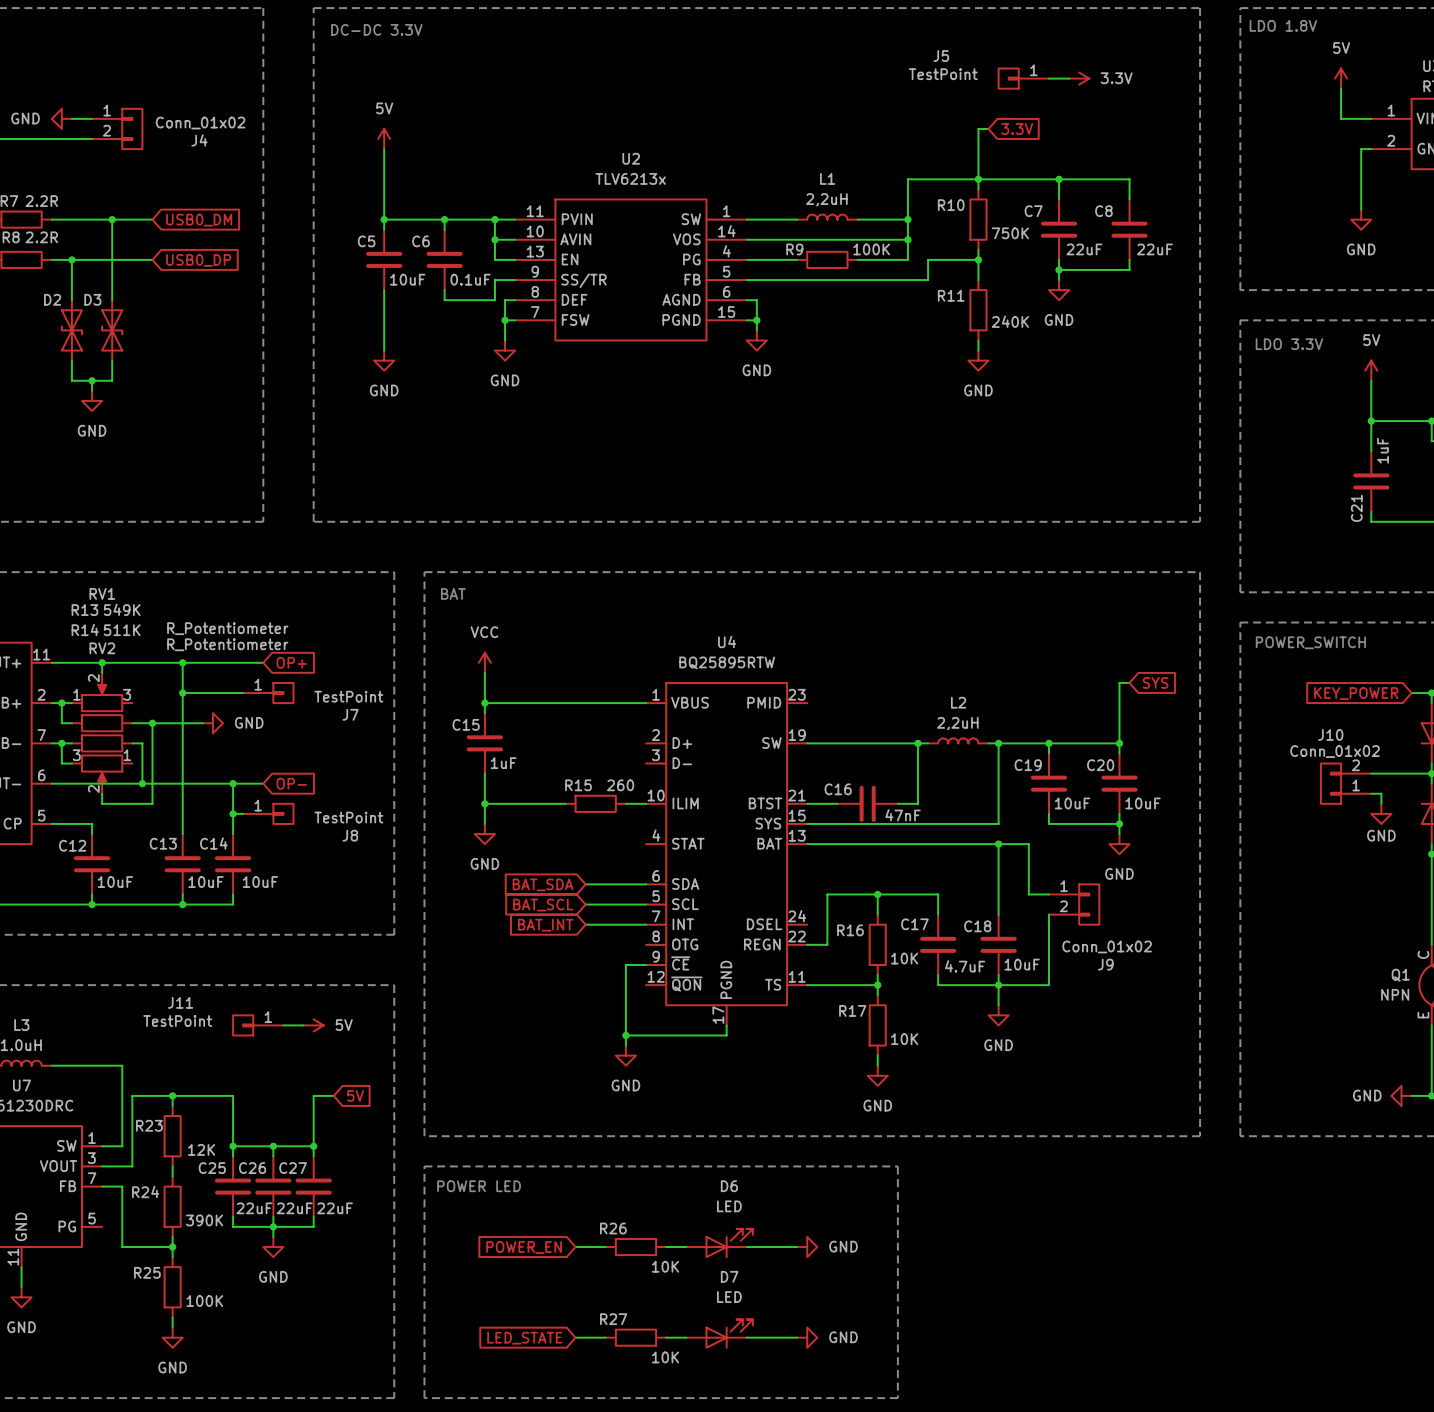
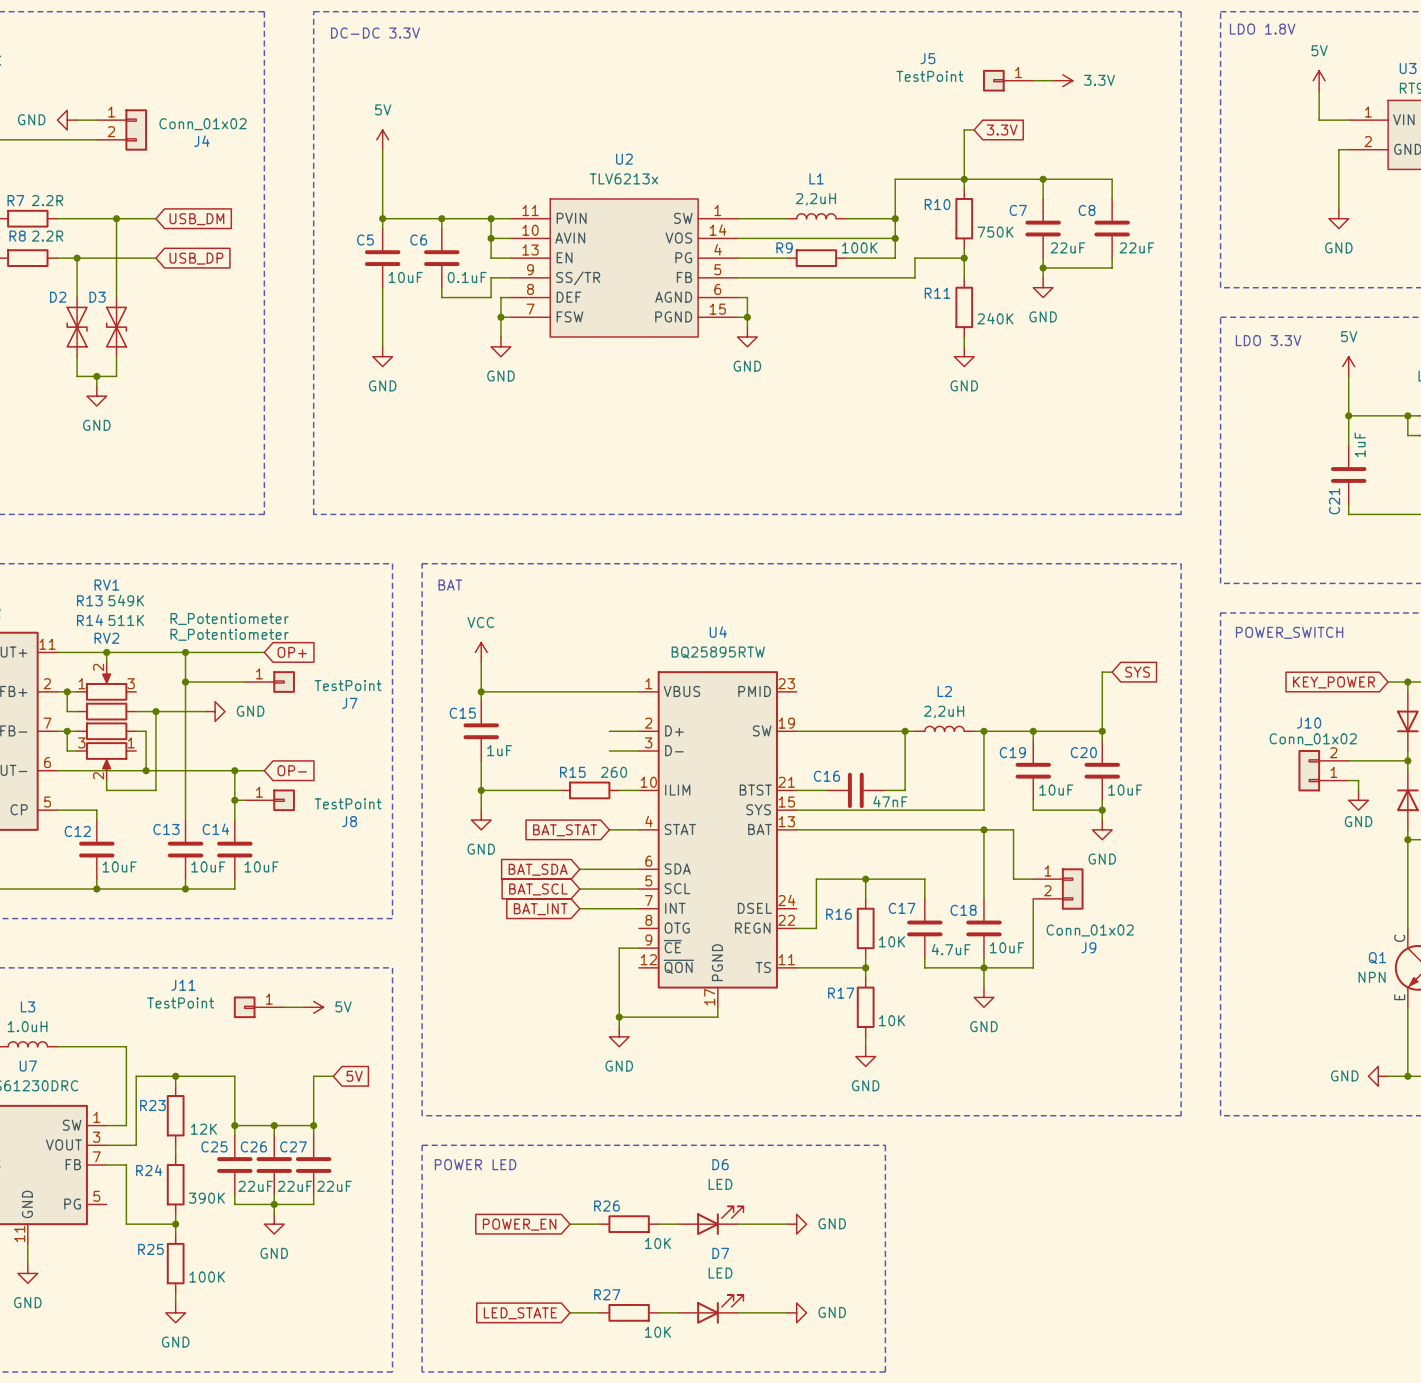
global label: USB0_DM (199, 220) -> USB_DM (196, 219)
global label: USB0_DP (198, 260) -> USB_DP (196, 258)
wire: none -> (609, 731) (638, 731)
wire: none -> (609, 751) (638, 751)
global label: none -> BAT_STAT (565, 830)
wire: none -> (609, 829) (638, 829)

